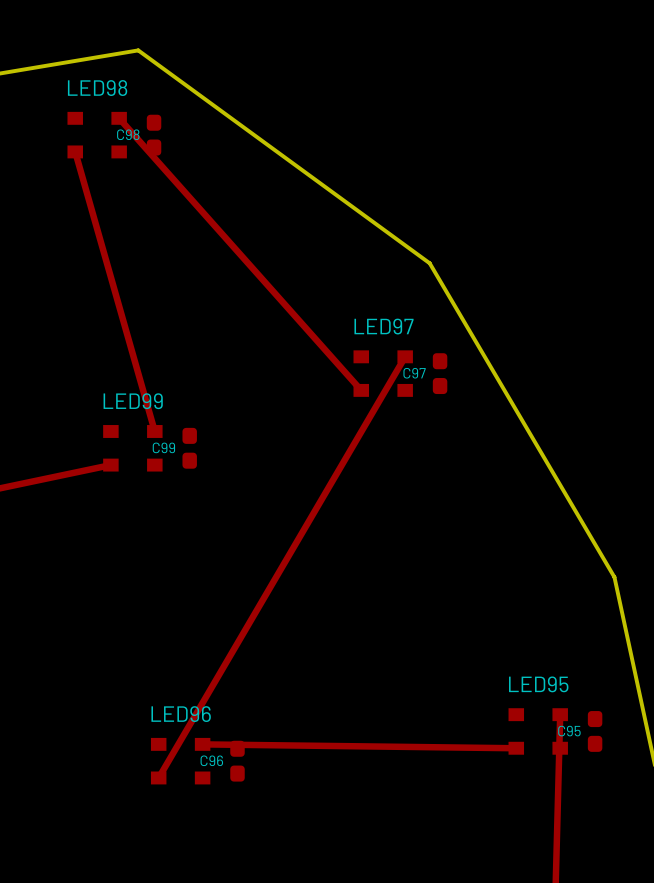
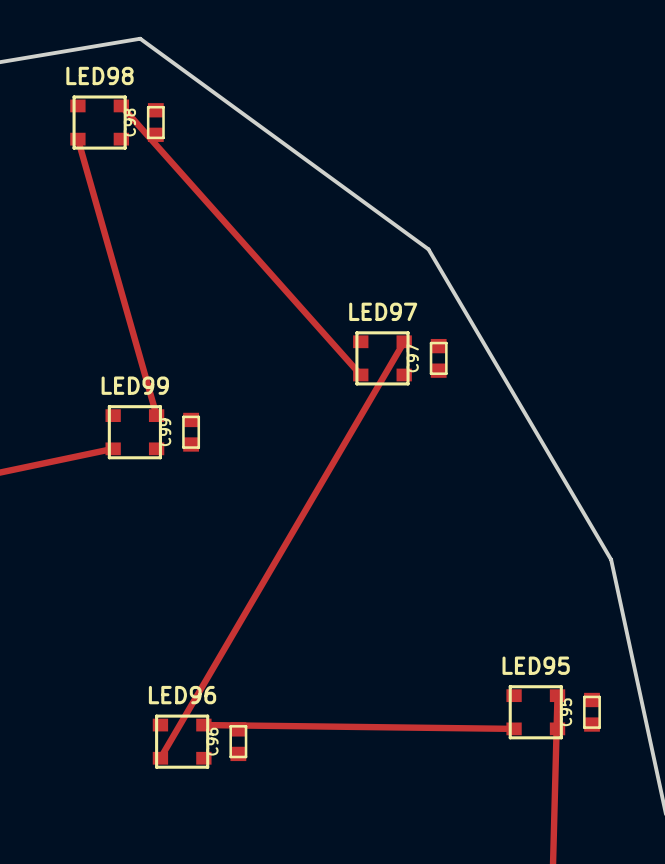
LED98 footprint: [67, 111, 127, 159] -> [70, 95, 130, 150]
C98 footprint: [146, 114, 162, 156] -> [146, 103, 165, 142]
LED97 footprint: [353, 350, 413, 397] -> [353, 331, 412, 386]
C97 footprint: [432, 353, 448, 395] -> [429, 338, 448, 378]
LED99 footprint: [103, 425, 163, 472] -> [105, 405, 165, 460]
C99 footprint: [182, 427, 197, 469] -> [182, 412, 201, 452]
LED95 footprint: [508, 708, 568, 755] -> [506, 685, 566, 740]
C95 footprint: [587, 711, 603, 752] -> [583, 692, 601, 732]
LED96 footprint: [150, 737, 211, 785] -> [152, 714, 212, 769]
C96 footprint: [230, 740, 245, 782] -> [229, 722, 248, 762]

